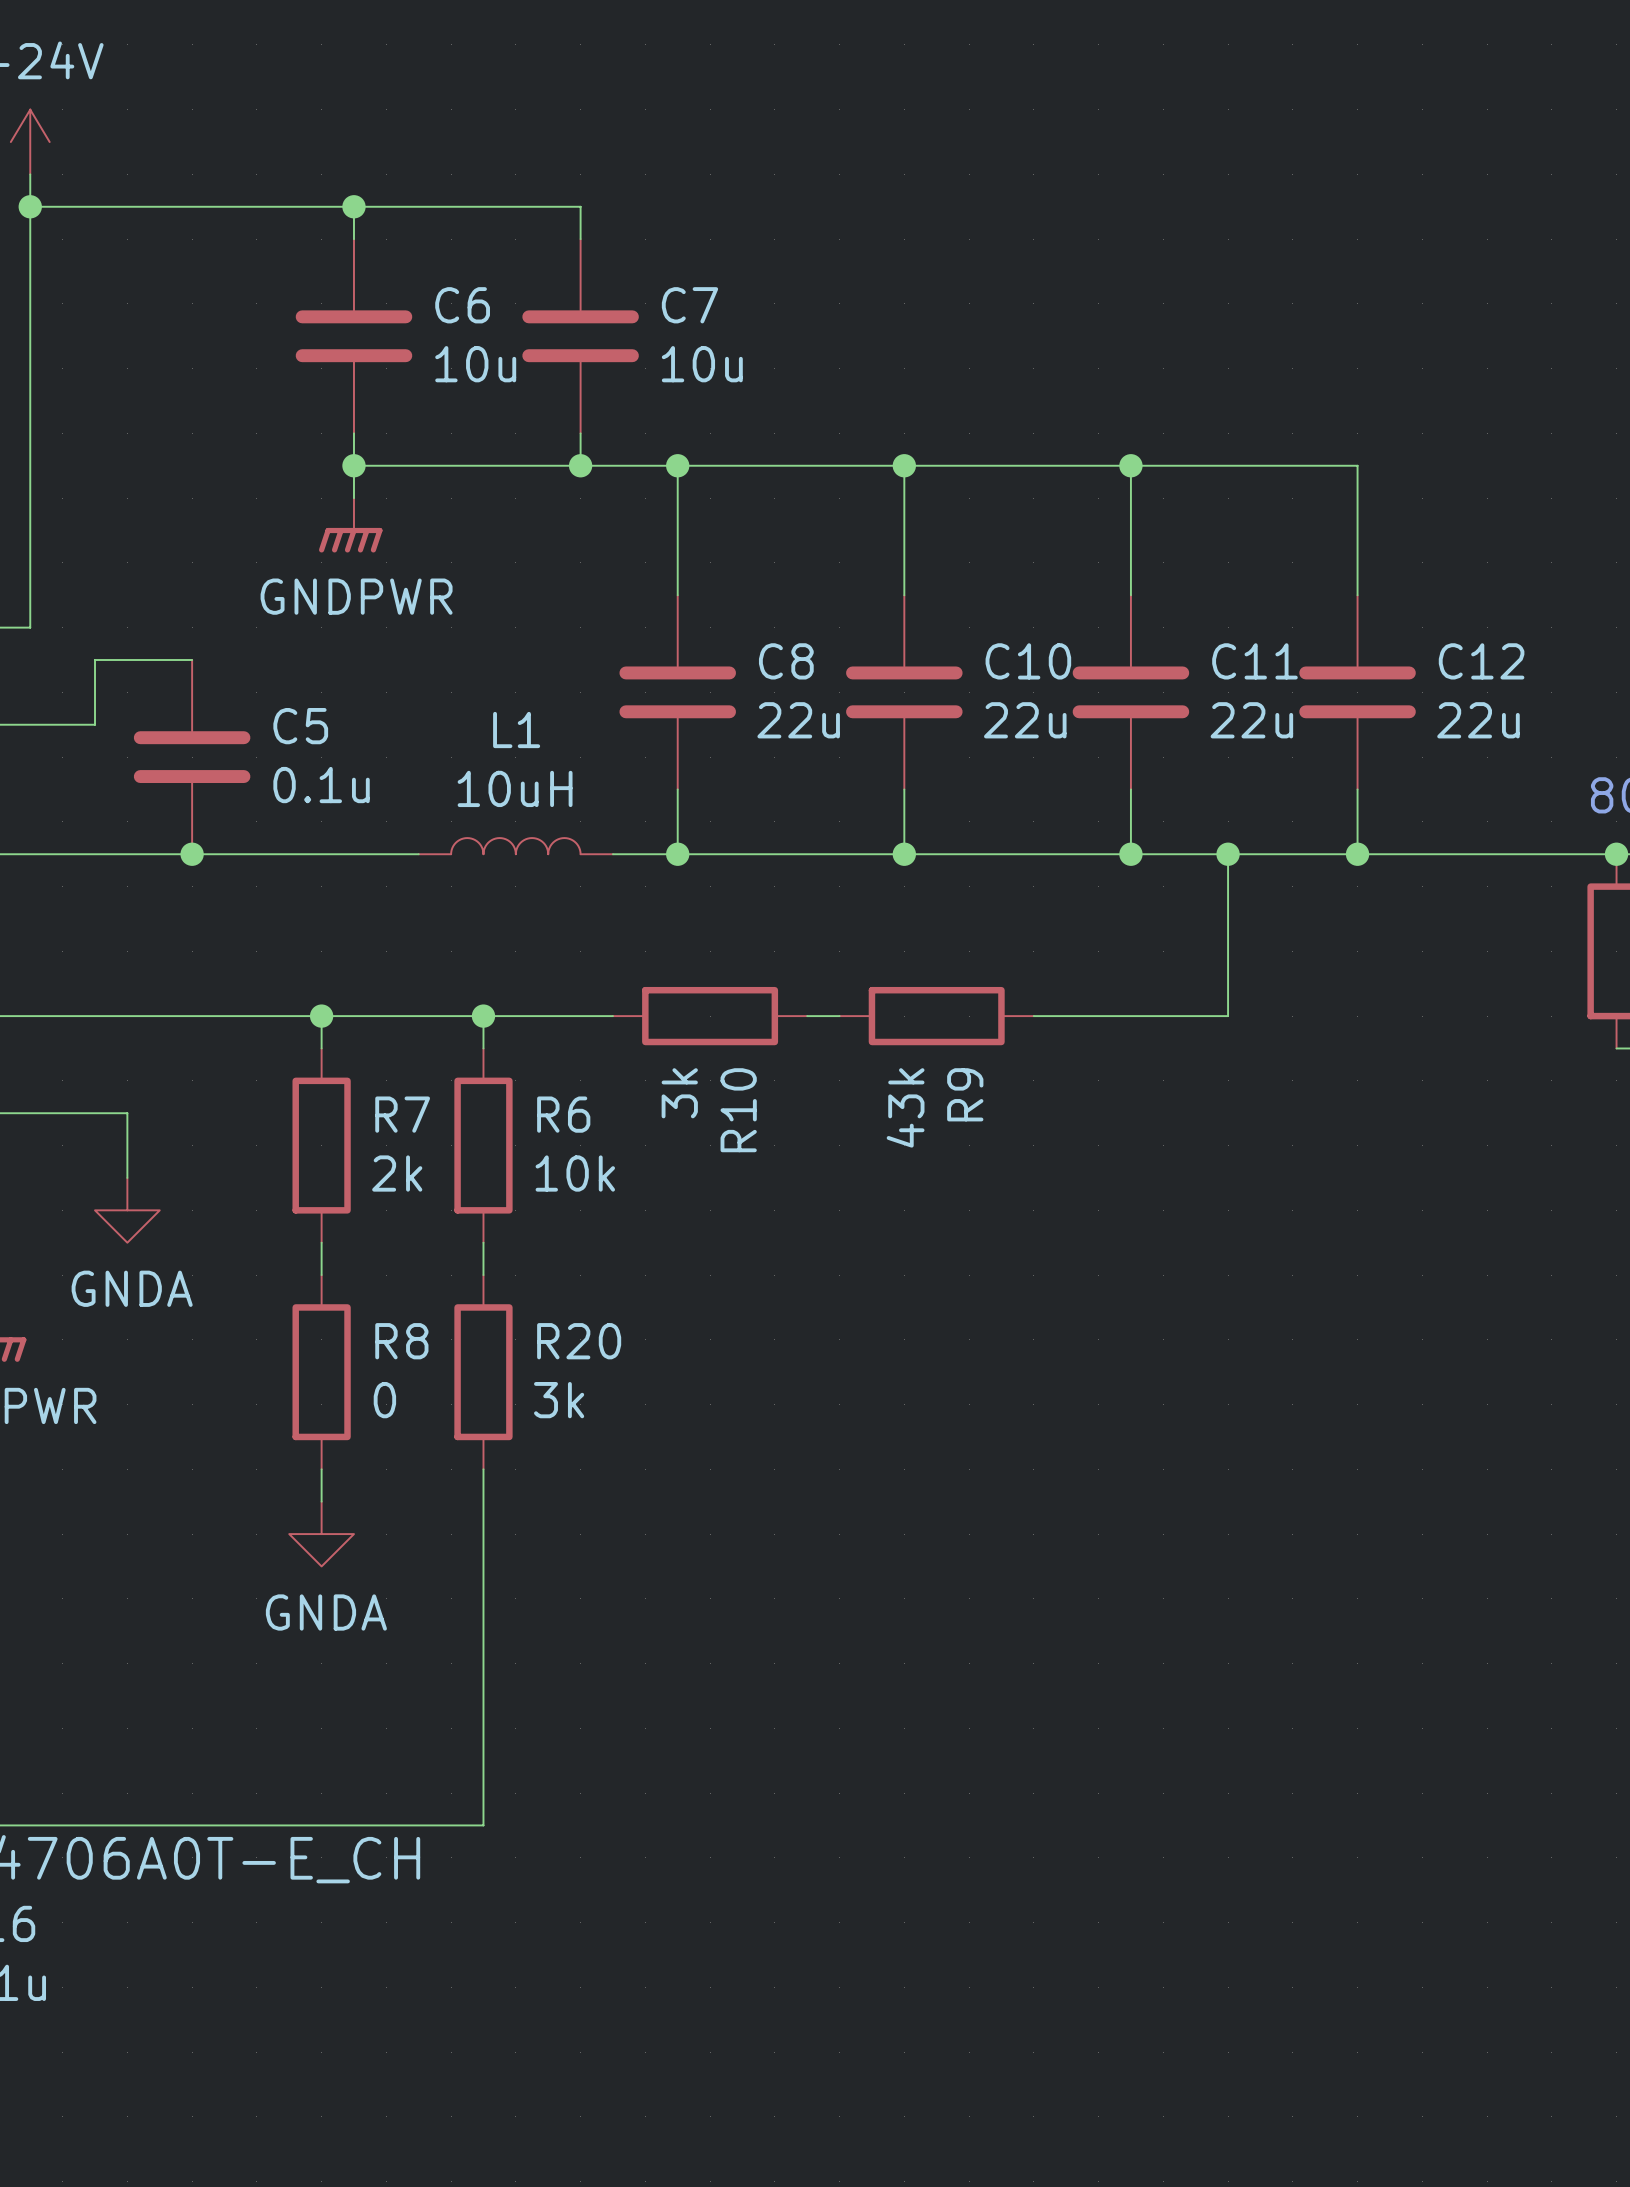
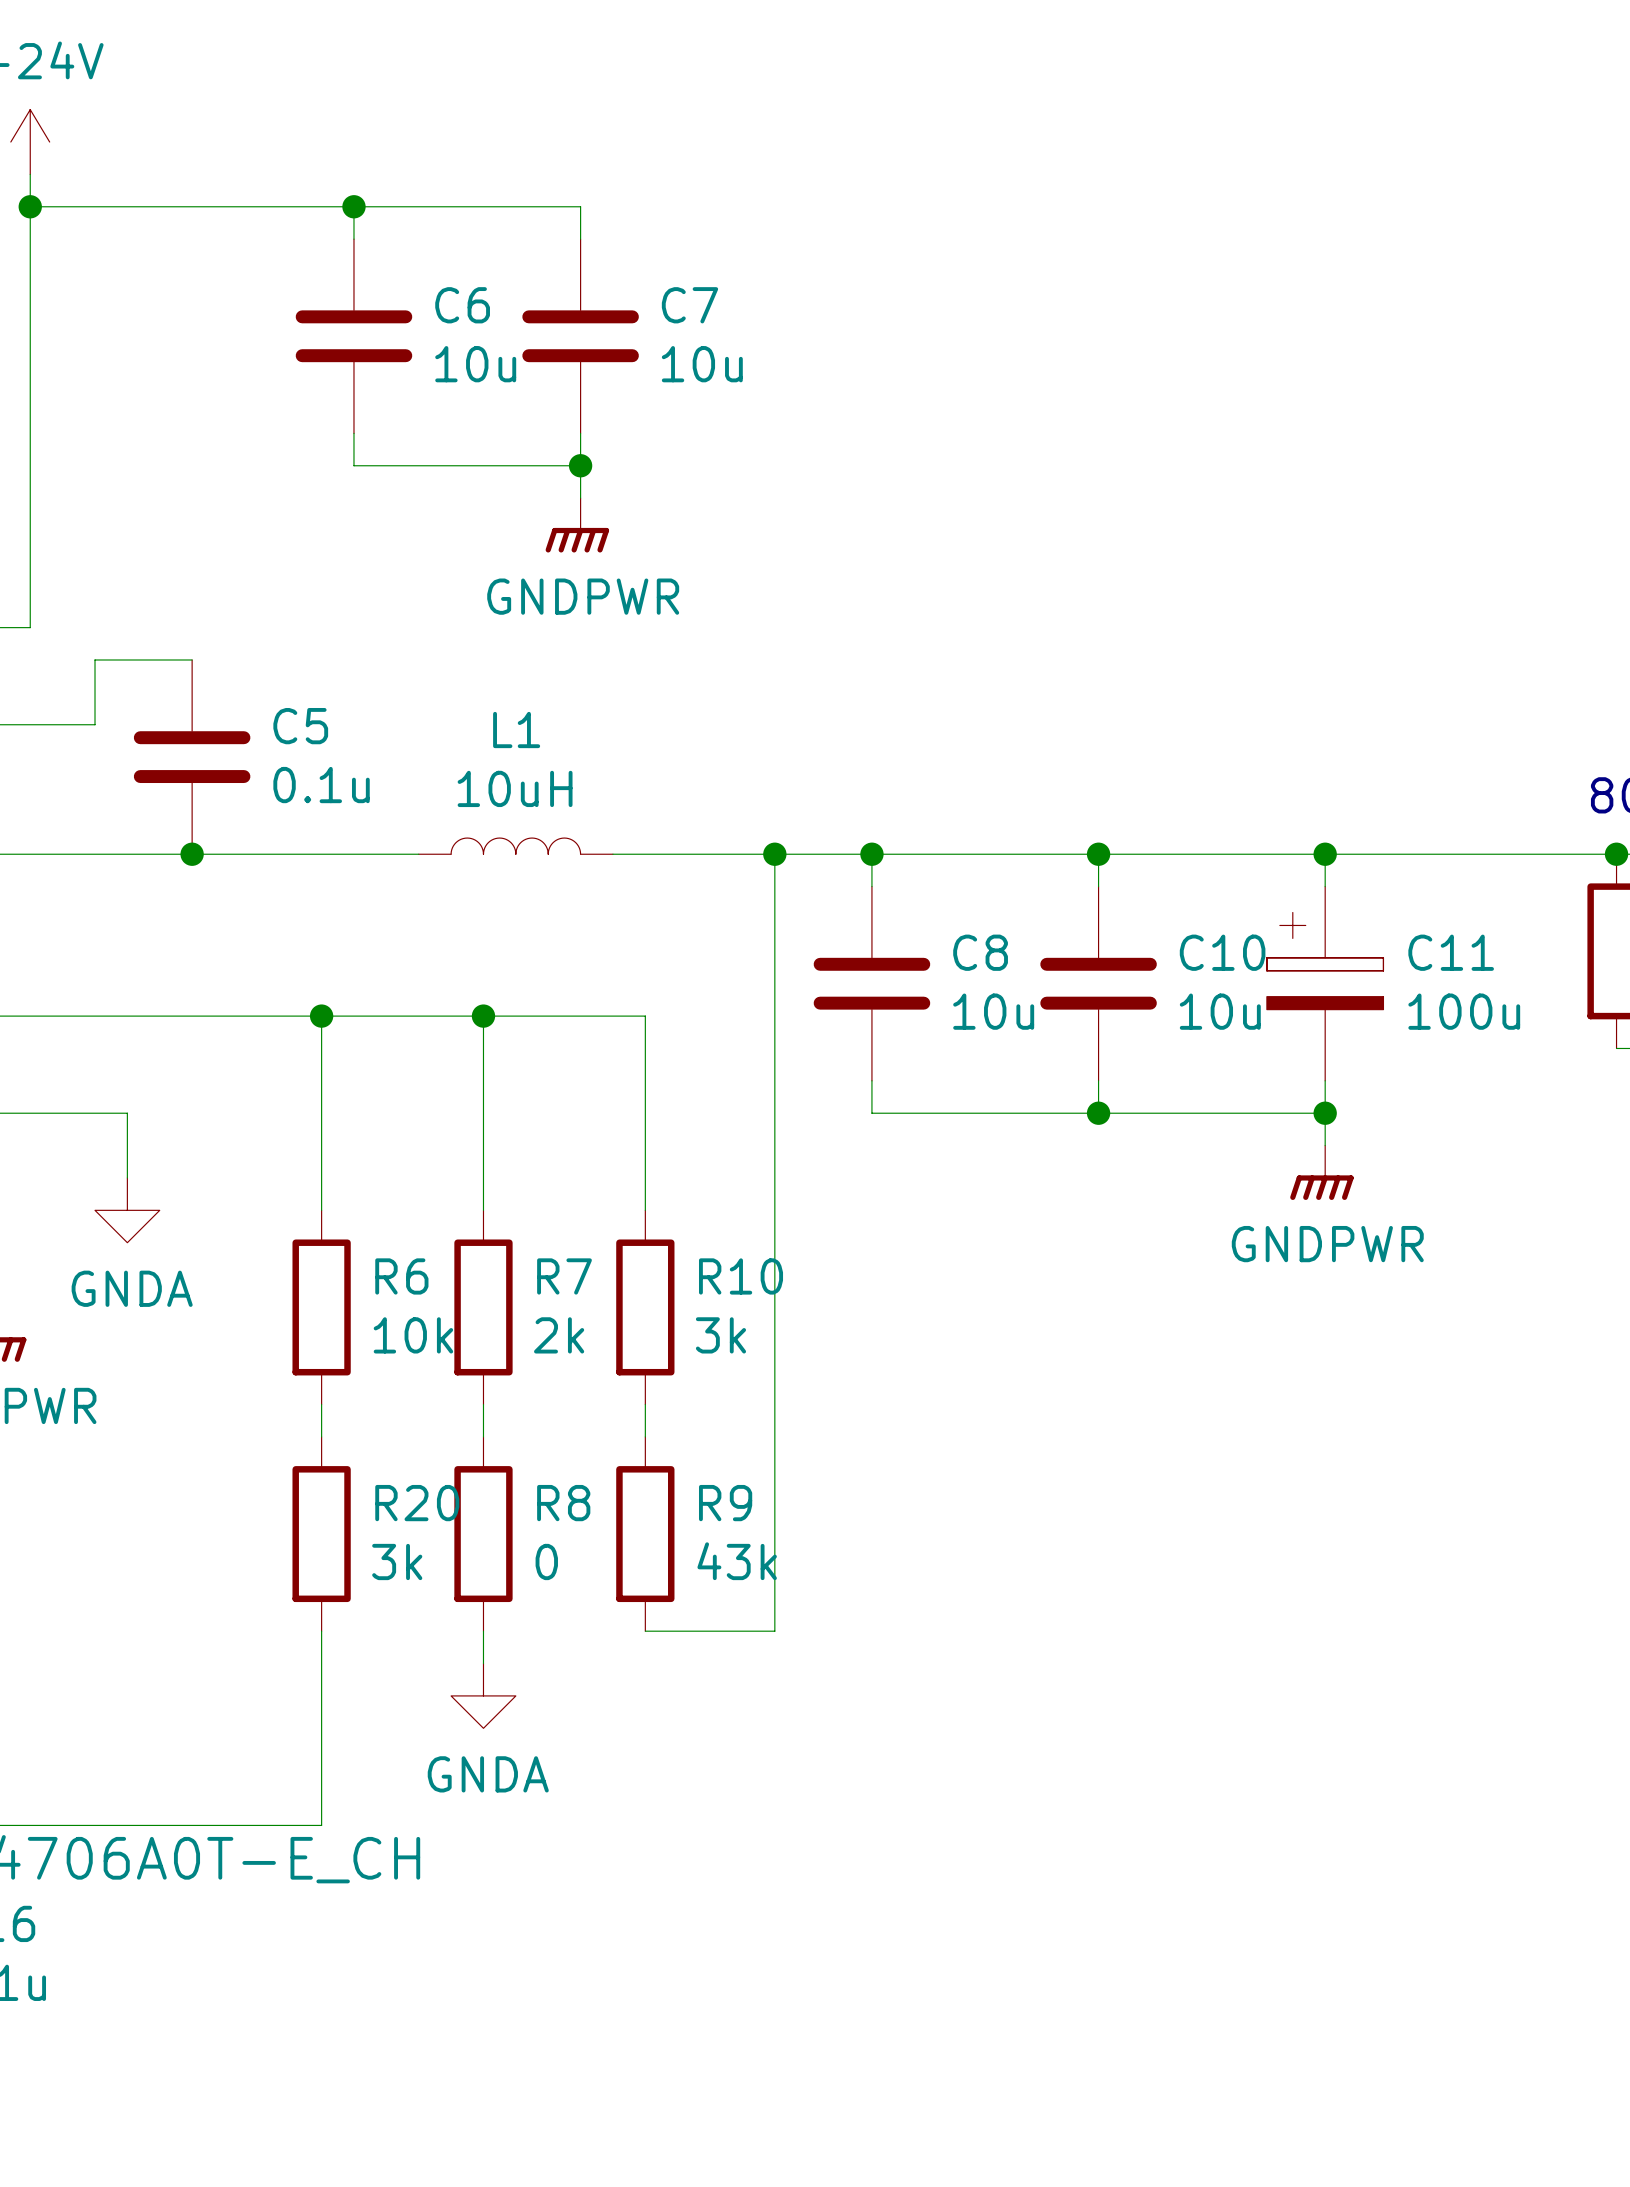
wire: (353, 465) (353, 498) -> none
junction: (353, 465) -> none
wire: (580, 465) (1357, 465) (1357, 595) -> (580, 465) (580, 498)
wire: (677, 465) (677, 595) -> none
junction: (677, 465) -> none
wire: (904, 465) (904, 595) -> none
junction: (904, 465) -> none
wire: (1130, 465) (1130, 595) -> none
junction: (1130, 465) -> none
power symbol position: GNDPWR (350, 525) -> GNDPWR (577, 525)
C11 symbol: [1072, 595, 1190, 790] -> [1266, 886, 1384, 1081]
C8 position: (677, 692) -> (871, 983)
C10 position: (904, 692) -> (1098, 983)
C12: 22u (1357, 692) -> none
C8 value: 22u (798, 720) -> 10u (993, 1011)
C10 value: 22u (1025, 720) -> 10u (1220, 1011)
C11 value: 22u (1251, 720) -> 100u (1464, 1011)
wire: (677, 789) (677, 854) -> none
wire: (904, 789) (904, 854) -> none
wire: (1130, 789) (1130, 854) -> none
wire: (1357, 789) (1357, 854) -> (1325, 1080) (1325, 1145)
junction: (677, 854) -> none
wire: none -> (774, 854) (774, 1631) (645, 1631)
junction: none -> (774, 854)
wire: none -> (871, 854) (871, 886)
junction position: (904, 854) -> (871, 854)
wire: none -> (1098, 854) (1098, 886)
junction position: (1130, 854) -> (1098, 854)
wire: (1228, 854) (1228, 1016) (1033, 1016) -> none
junction: (1228, 854) -> none
wire: none -> (1325, 854) (1325, 886)
junction position: (1357, 854) -> (1325, 854)
wire: none -> (612, 1016) (645, 1016) (645, 1210)
R10 rotation: 0° (710, 1016) -> 90° clockwise (645, 1307)
R10 position: (710, 1016) -> (645, 1307)
wire: (807, 1016) (839, 1016) -> none
R9 rotation: 0° (936, 1016) -> 90° clockwise (645, 1534)
R9 position: (936, 1016) -> (645, 1534)
wire: none -> (321, 1048) (321, 1210)
wire: none -> (871, 1080) (871, 1113) (1325, 1113)
wire: none -> (1098, 1080) (1098, 1113)
R10 value position: 3k (679, 1093) -> 3k (720, 1335)
R9 name position: R9 (965, 1094) -> R9 (725, 1503)
R9 value position: 43k (905, 1107) -> 43k (737, 1561)
R10 name position: R10 (738, 1110) -> R10 (741, 1276)
junction: none -> (1098, 1113)
junction: none -> (1325, 1113)
R7 position: (321, 1145) -> (483, 1307)
R6 position: (483, 1145) -> (321, 1307)
power symbol: none -> GNDPWR (1321, 1172)
wire: (321, 1242) (321, 1275) -> (321, 1404) (321, 1436)
wire: (483, 1242) (483, 1275) -> (483, 1404) (483, 1436)
R8 position: (321, 1372) -> (483, 1534)
R20 position: (483, 1372) -> (321, 1534)
wire: (321, 1469) (321, 1501) -> (645, 1404) (645, 1436)
wire: (483, 1469) (483, 1631) -> (483, 1048) (483, 1210)
power symbol position: GNDA (321, 1534) -> GNDA (483, 1695)
wire: (483, 1663) (483, 1825) (321, 1825) -> (321, 1631) (321, 1825)

